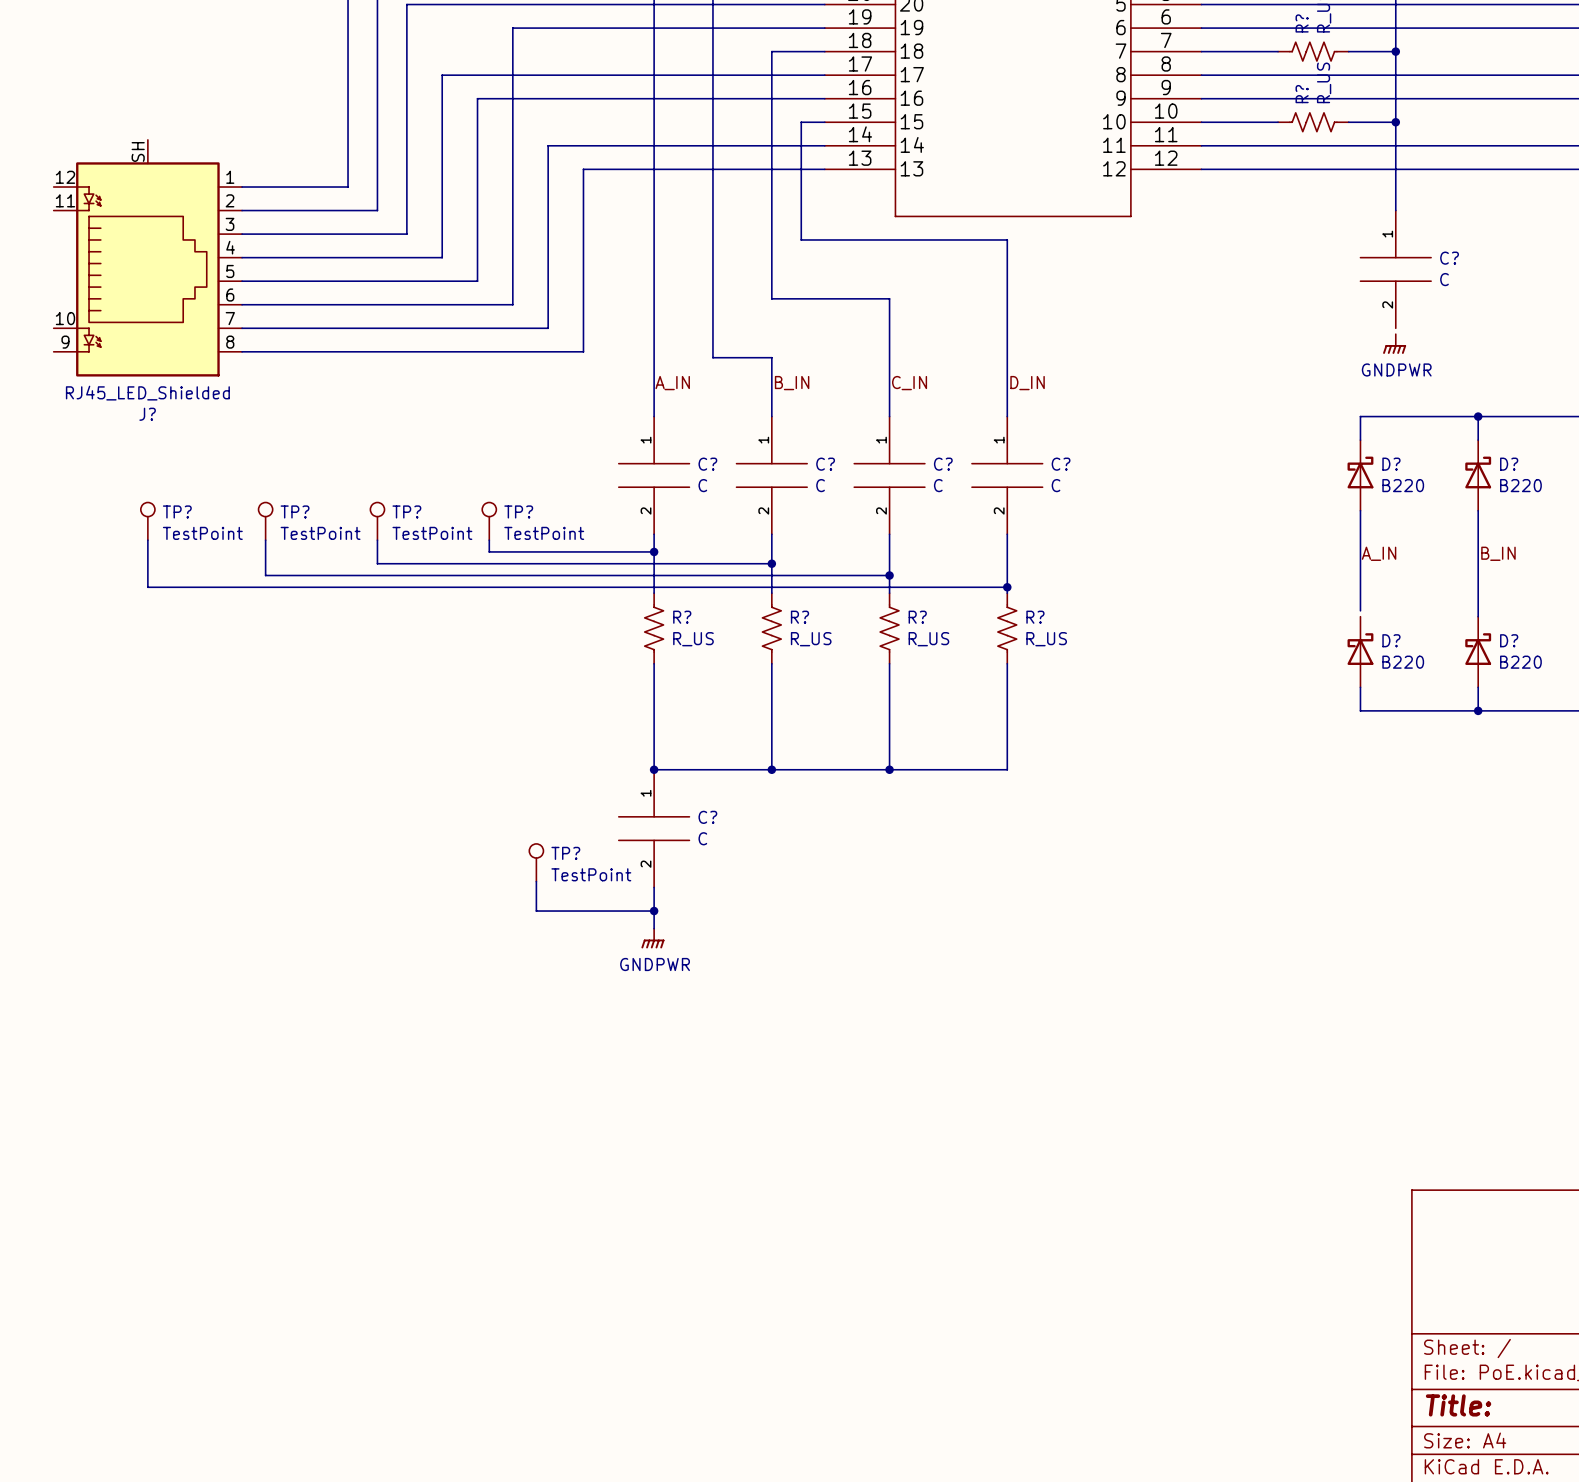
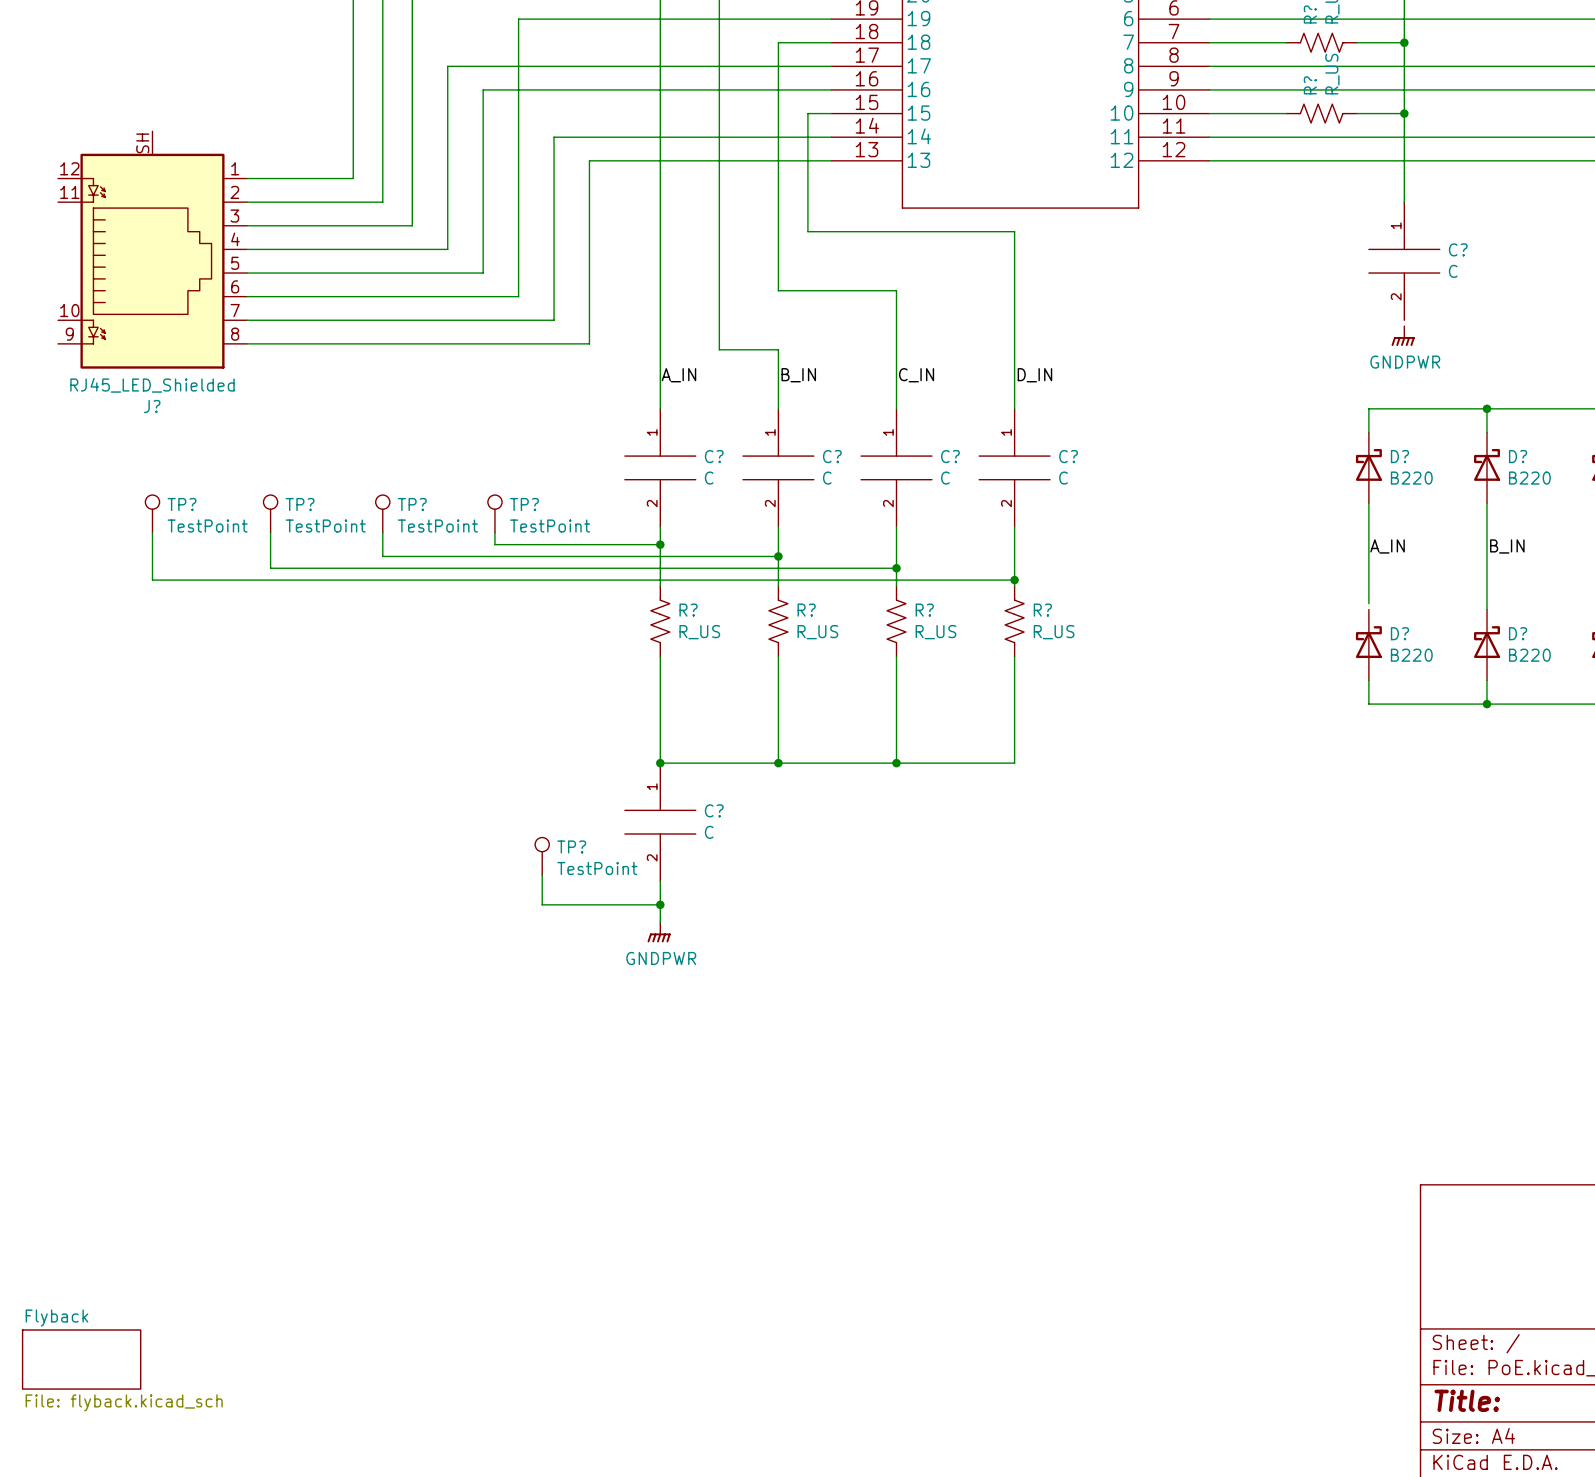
sheet Flyback: none -> File: flyback.kicad_sch (81, 1359)

